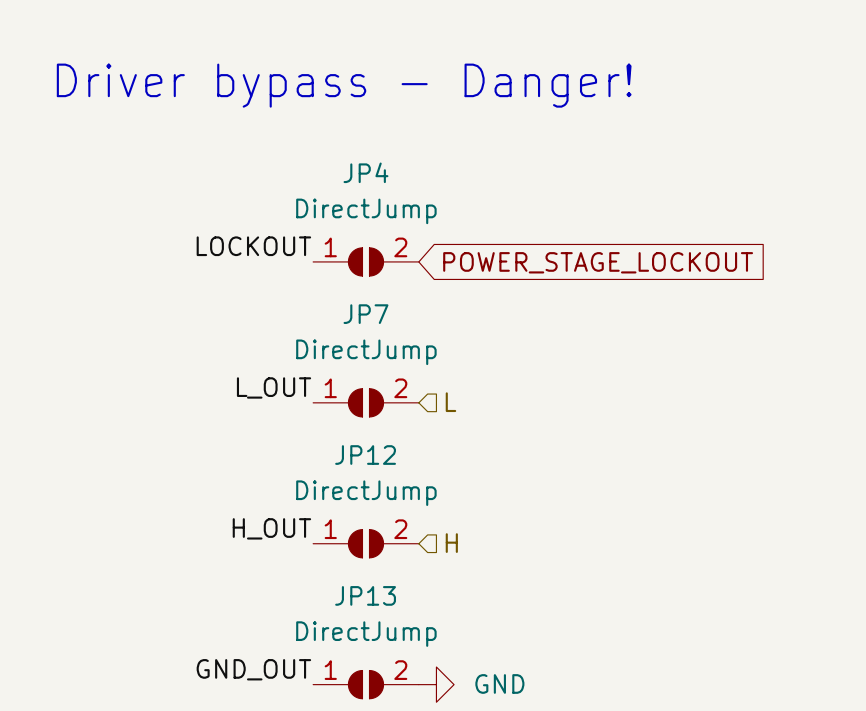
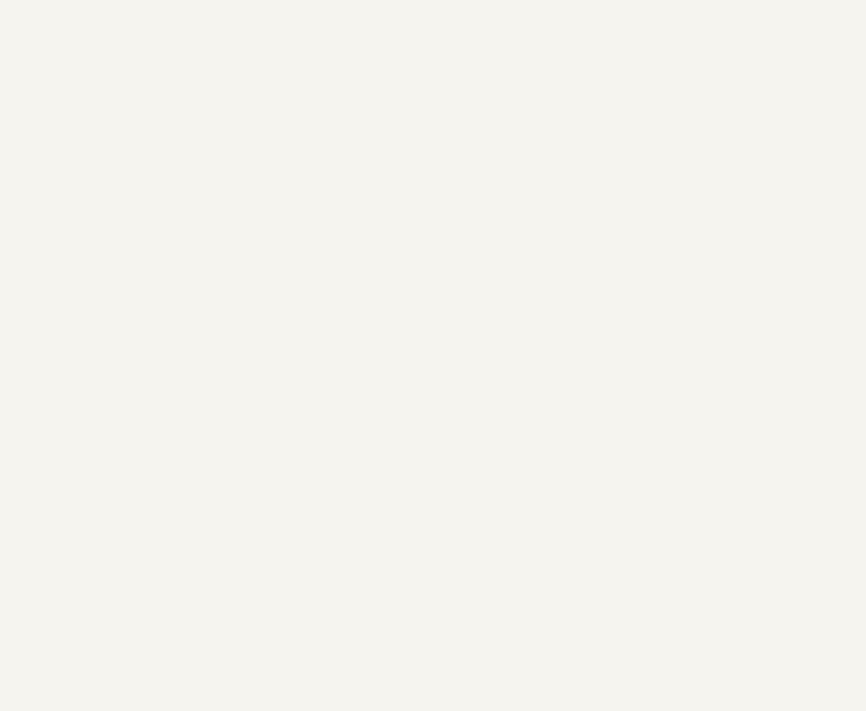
text: Driver bypass - Danger! (344, 85) -> none
label: LOCKOUT (253, 246) -> none
JP4: DirectJump (365, 261) -> none
global label: POWER_STAGE_LOCKOUT (598, 262) -> none
label: L_OUT (274, 387) -> none
JP7: DirectJump (365, 402) -> none
hierarchical label: L (450, 402) -> none
label: H_OUT (271, 528) -> none
JP12: DirectJump (365, 543) -> none
hierarchical label: H (451, 543) -> none
label: GND_OUT (253, 669) -> none
JP13: DirectJump (365, 684) -> none
power symbol: GND (436, 684) -> none

